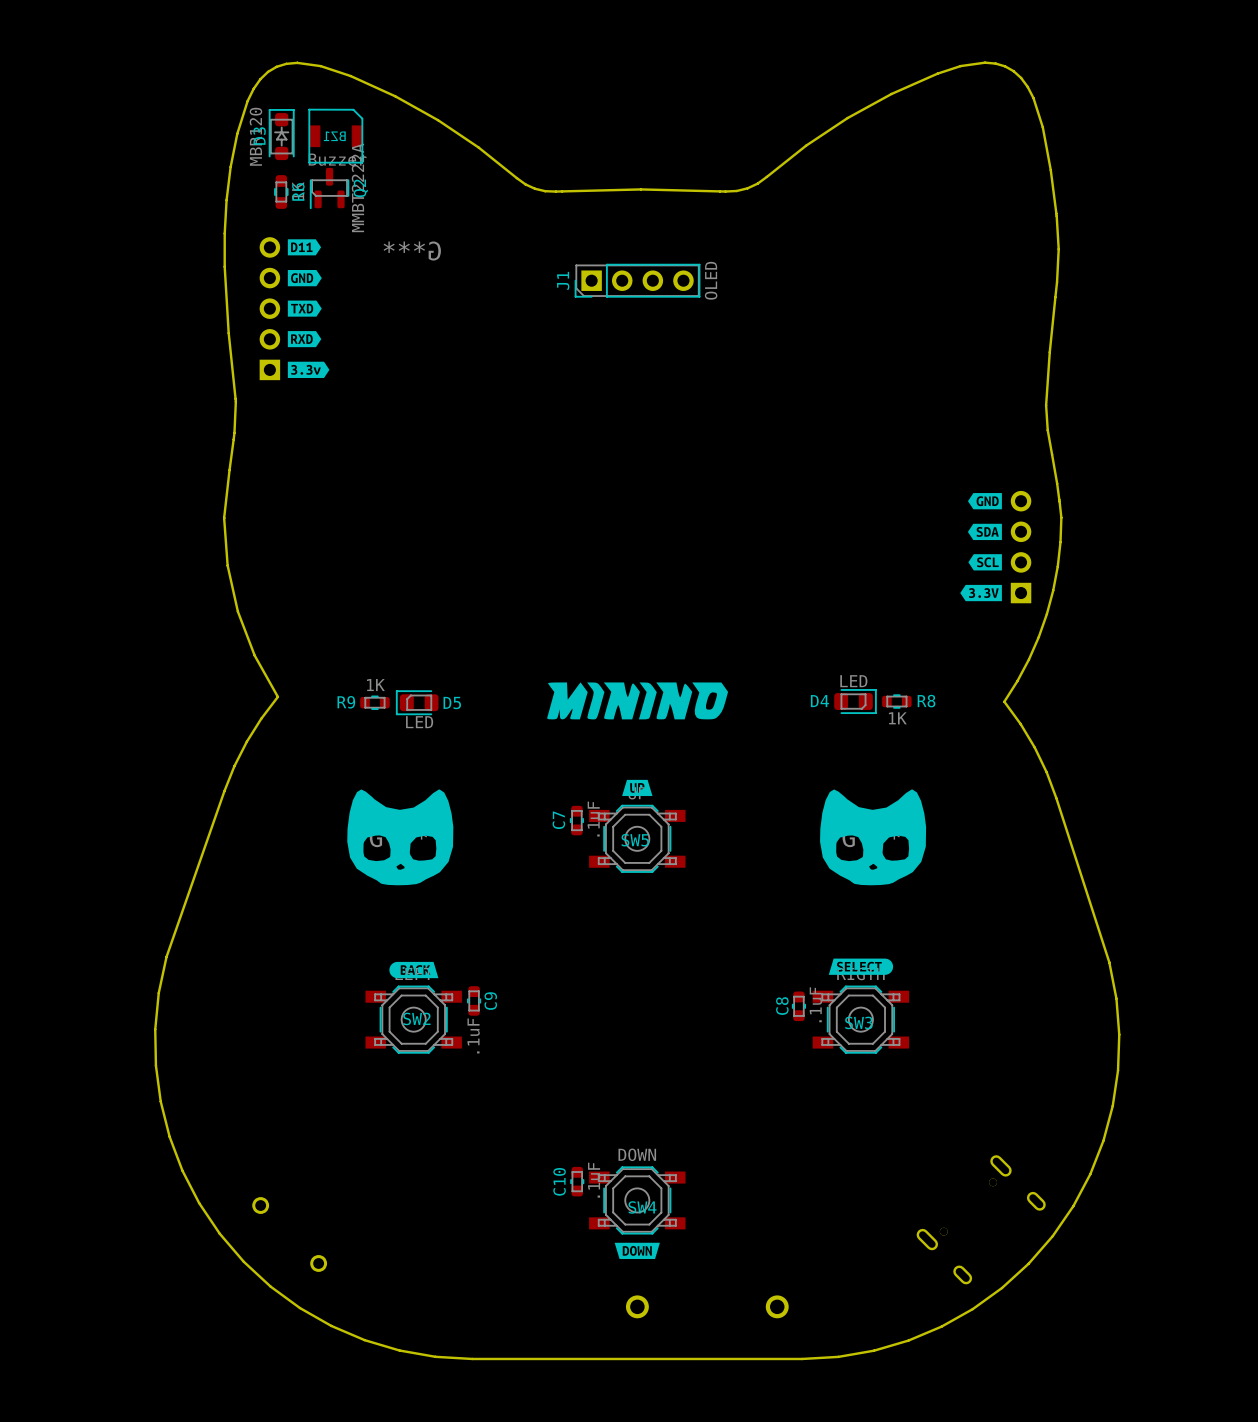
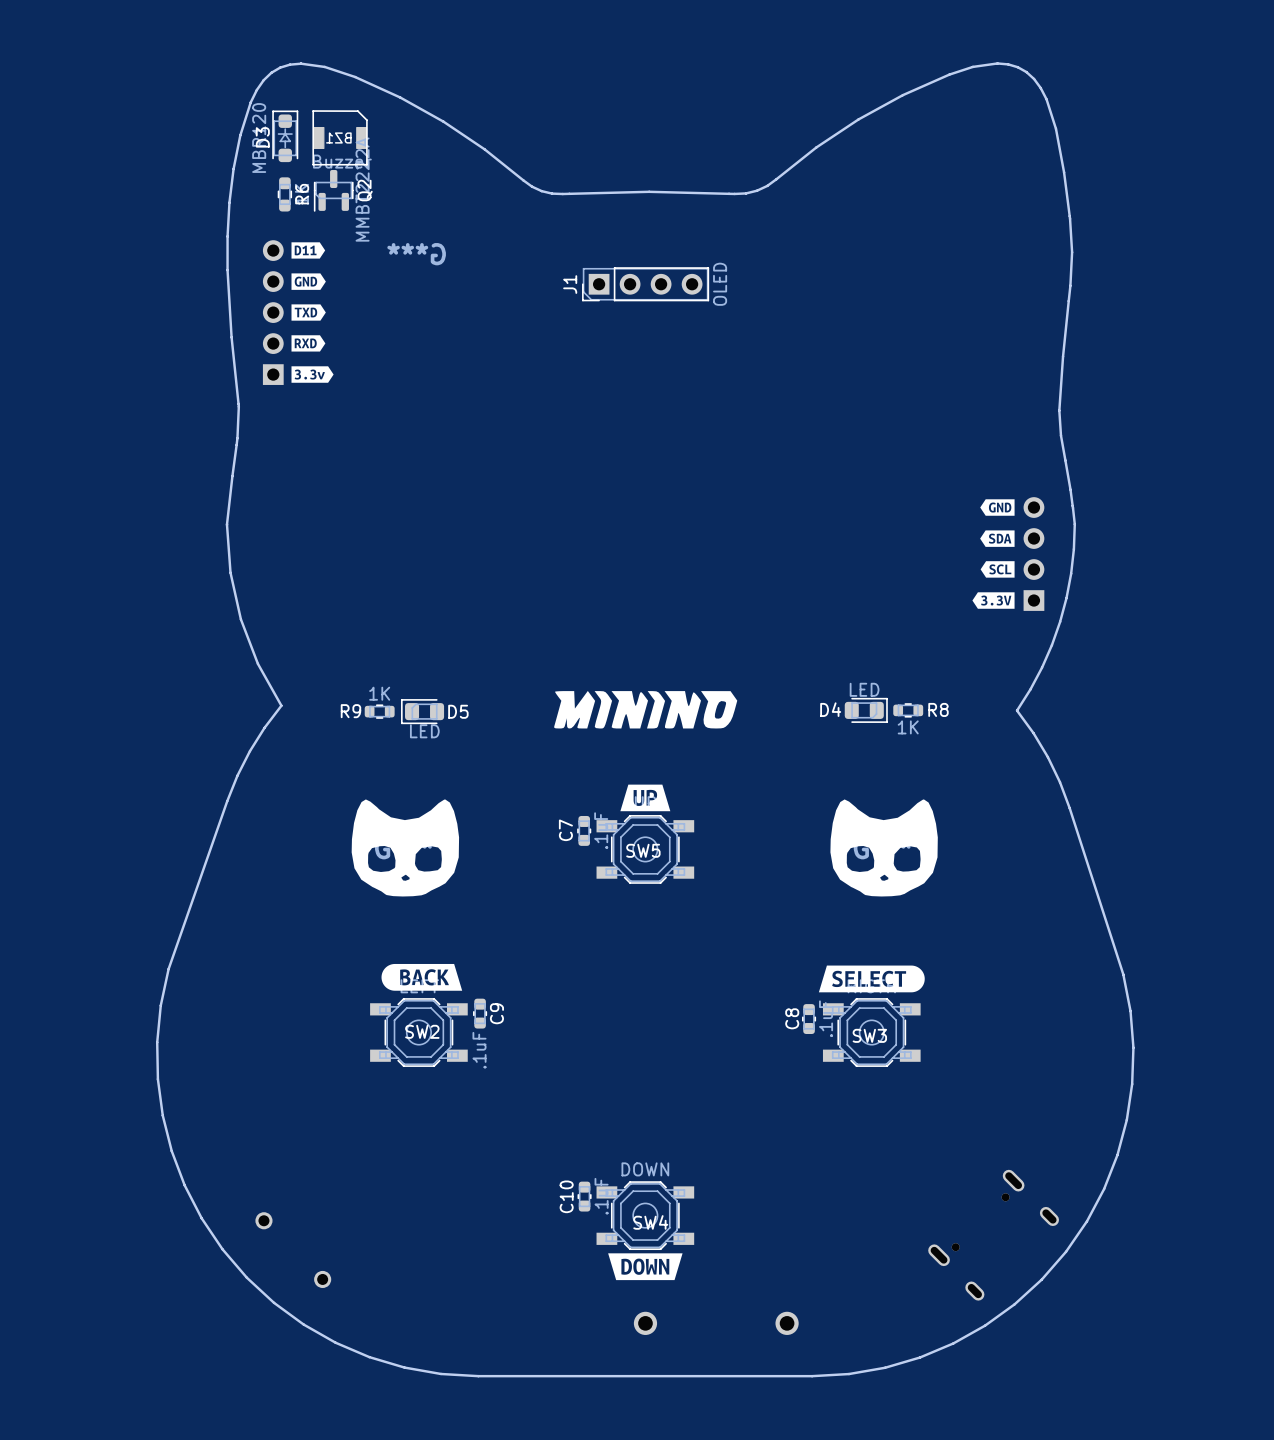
drawing shape: [622, 779, 653, 797] -> [620, 784, 671, 812]
drawing shape: [828, 958, 894, 975] -> [818, 965, 925, 993]
drawing shape: [389, 961, 439, 979] -> [381, 963, 463, 991]
drawing shape: [614, 1242, 660, 1260] -> [608, 1253, 683, 1281]

